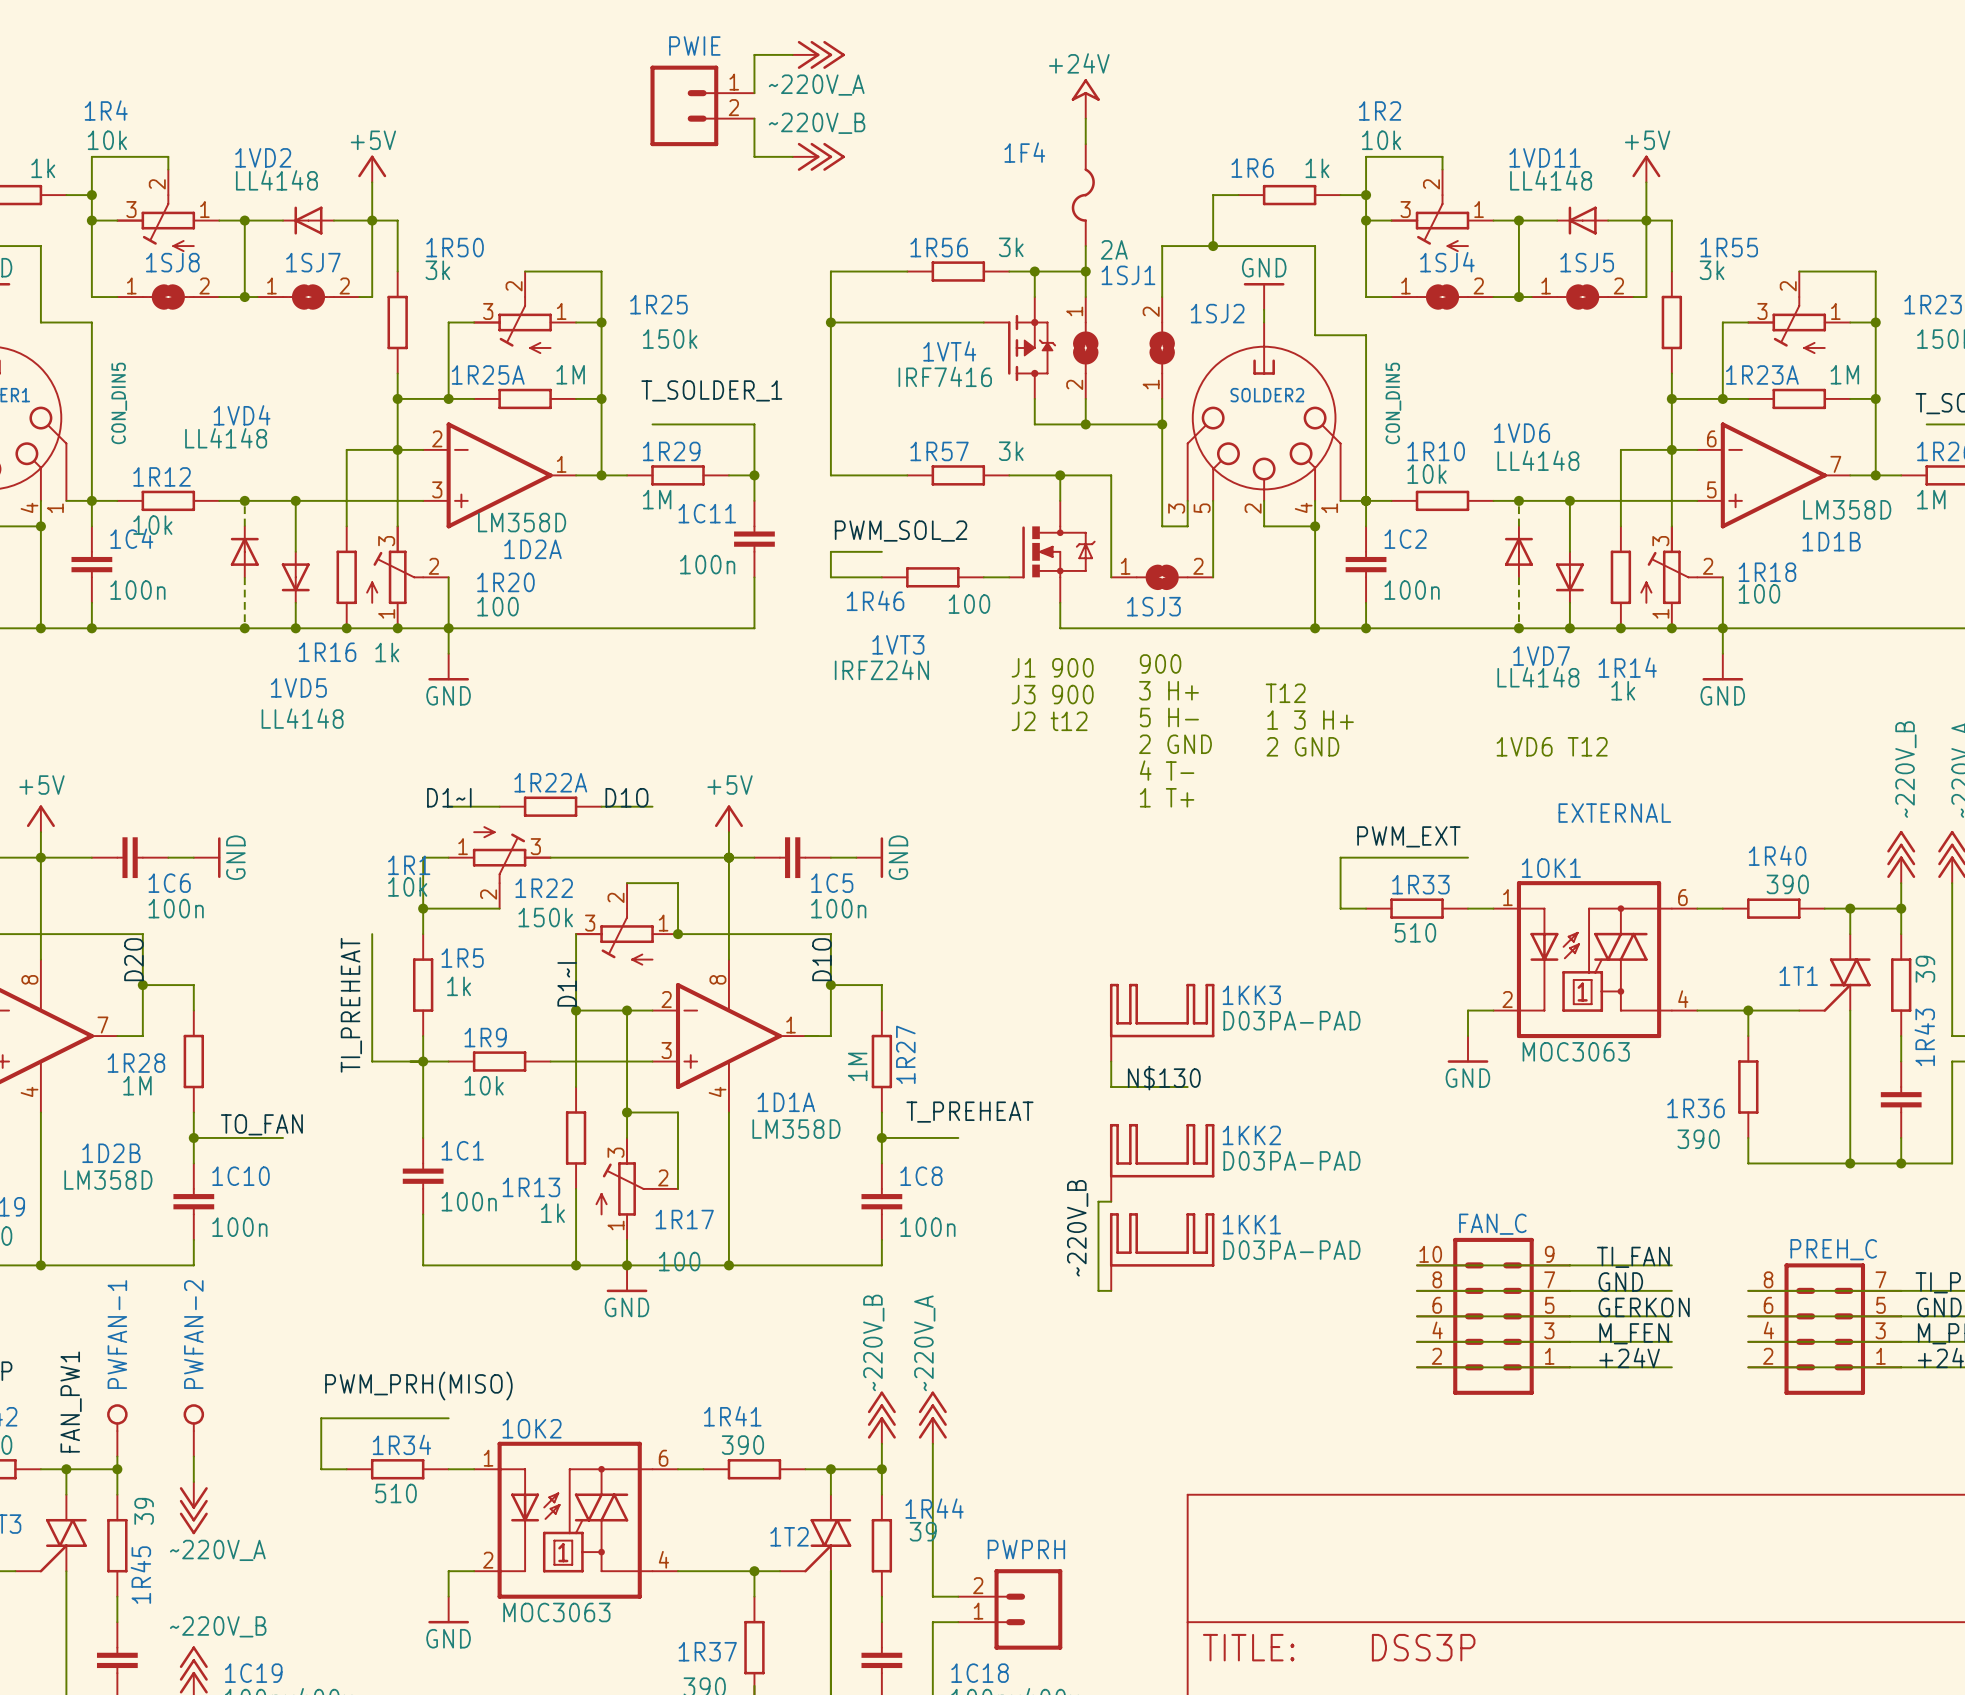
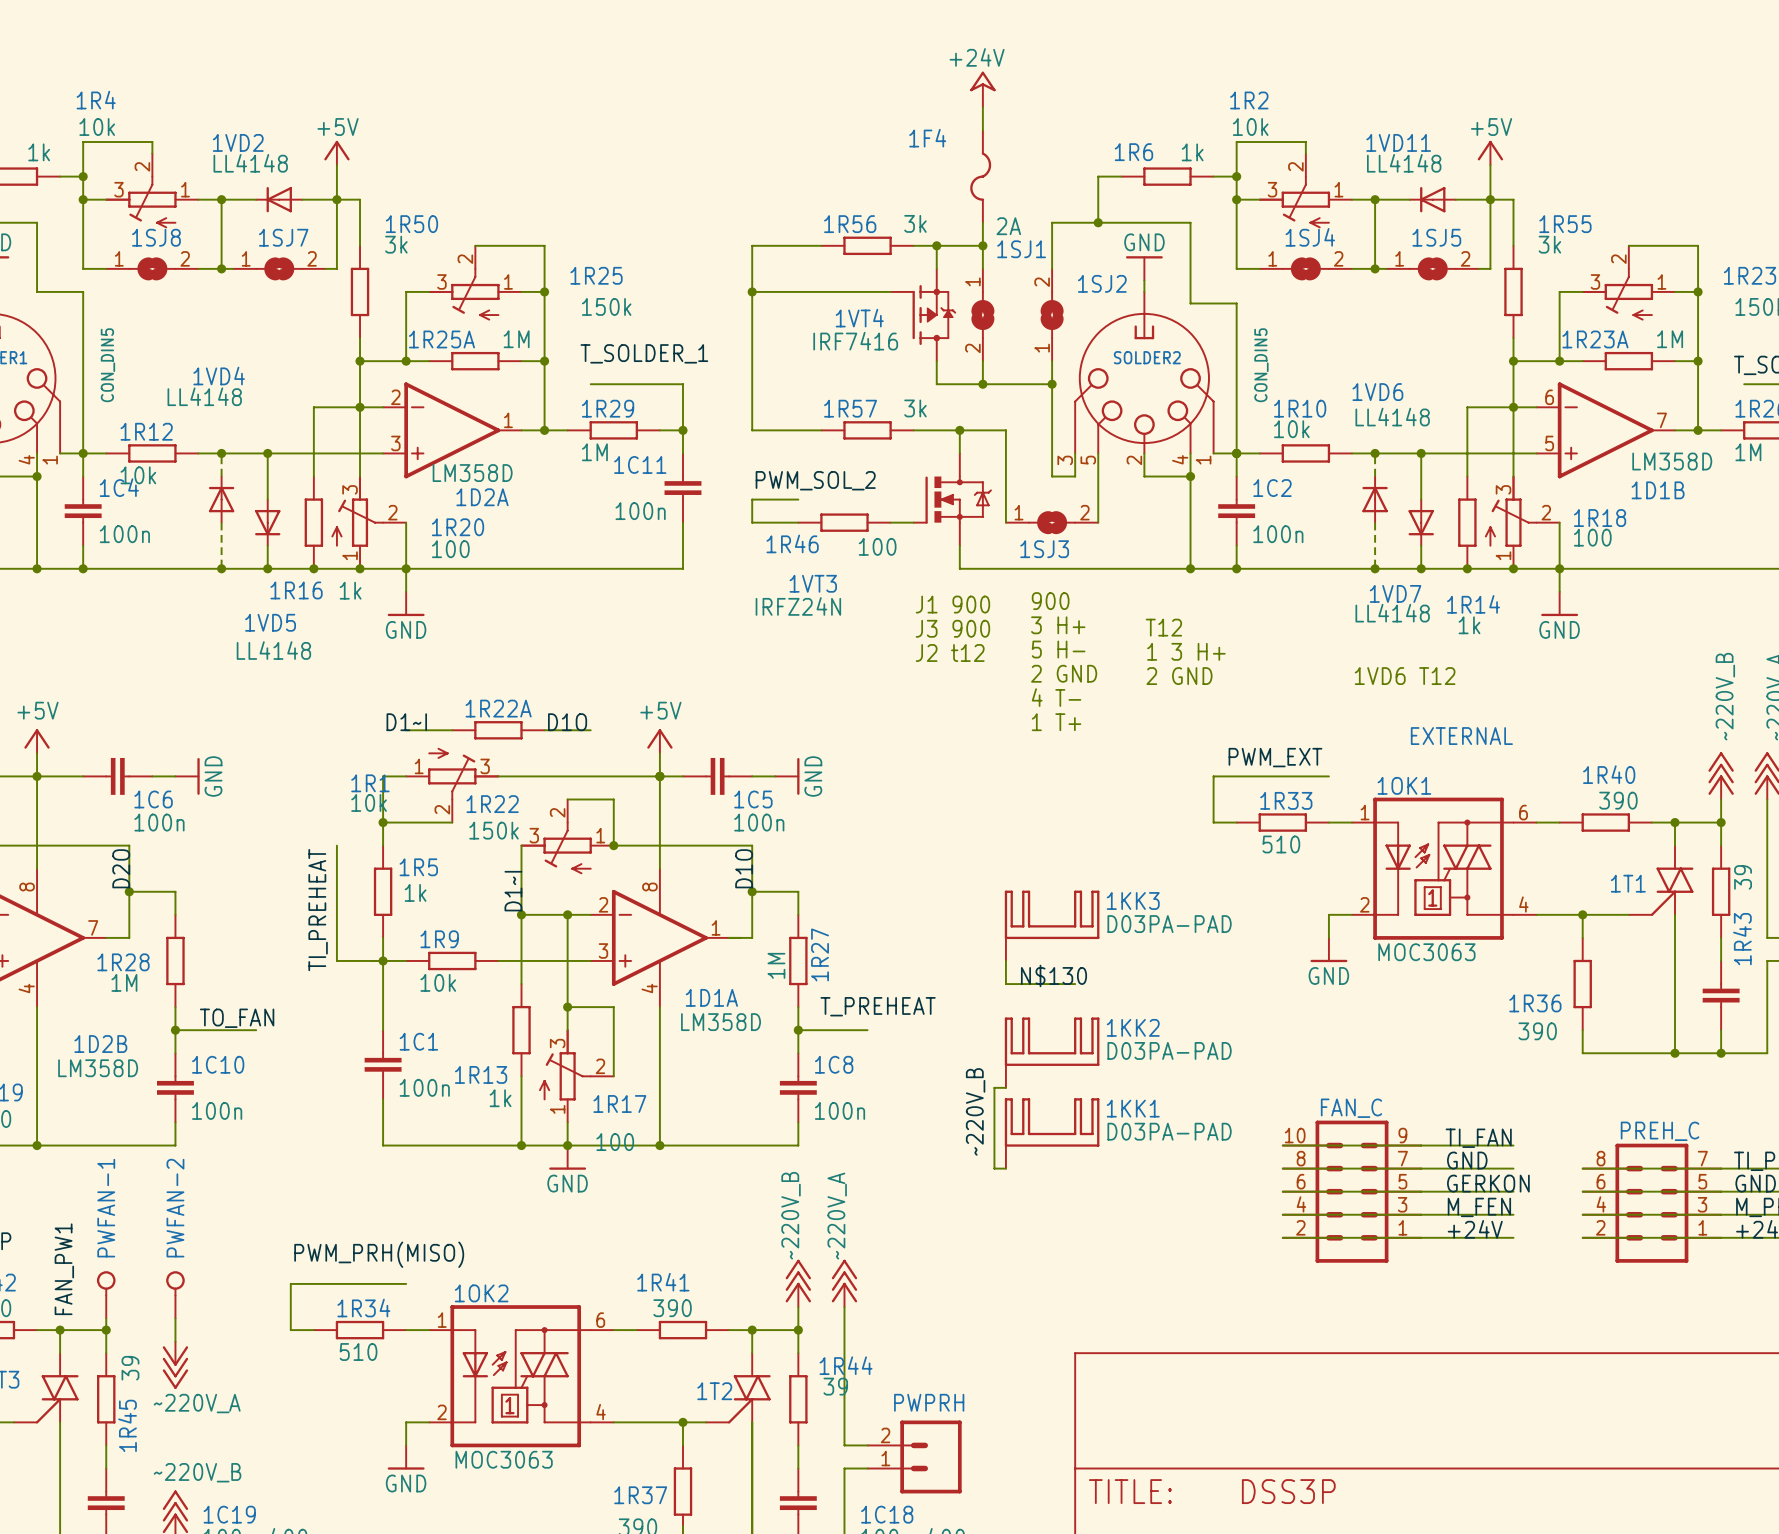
wire: (792, 54) (754, 54) (754, 93) -> none
power symbol: ~220V_A (818, 54) -> none
PWIE: (702, 105) -> none
wire: (754, 118) (754, 156) (792, 156) -> none
power symbol: ~220V_B (818, 156) -> none

